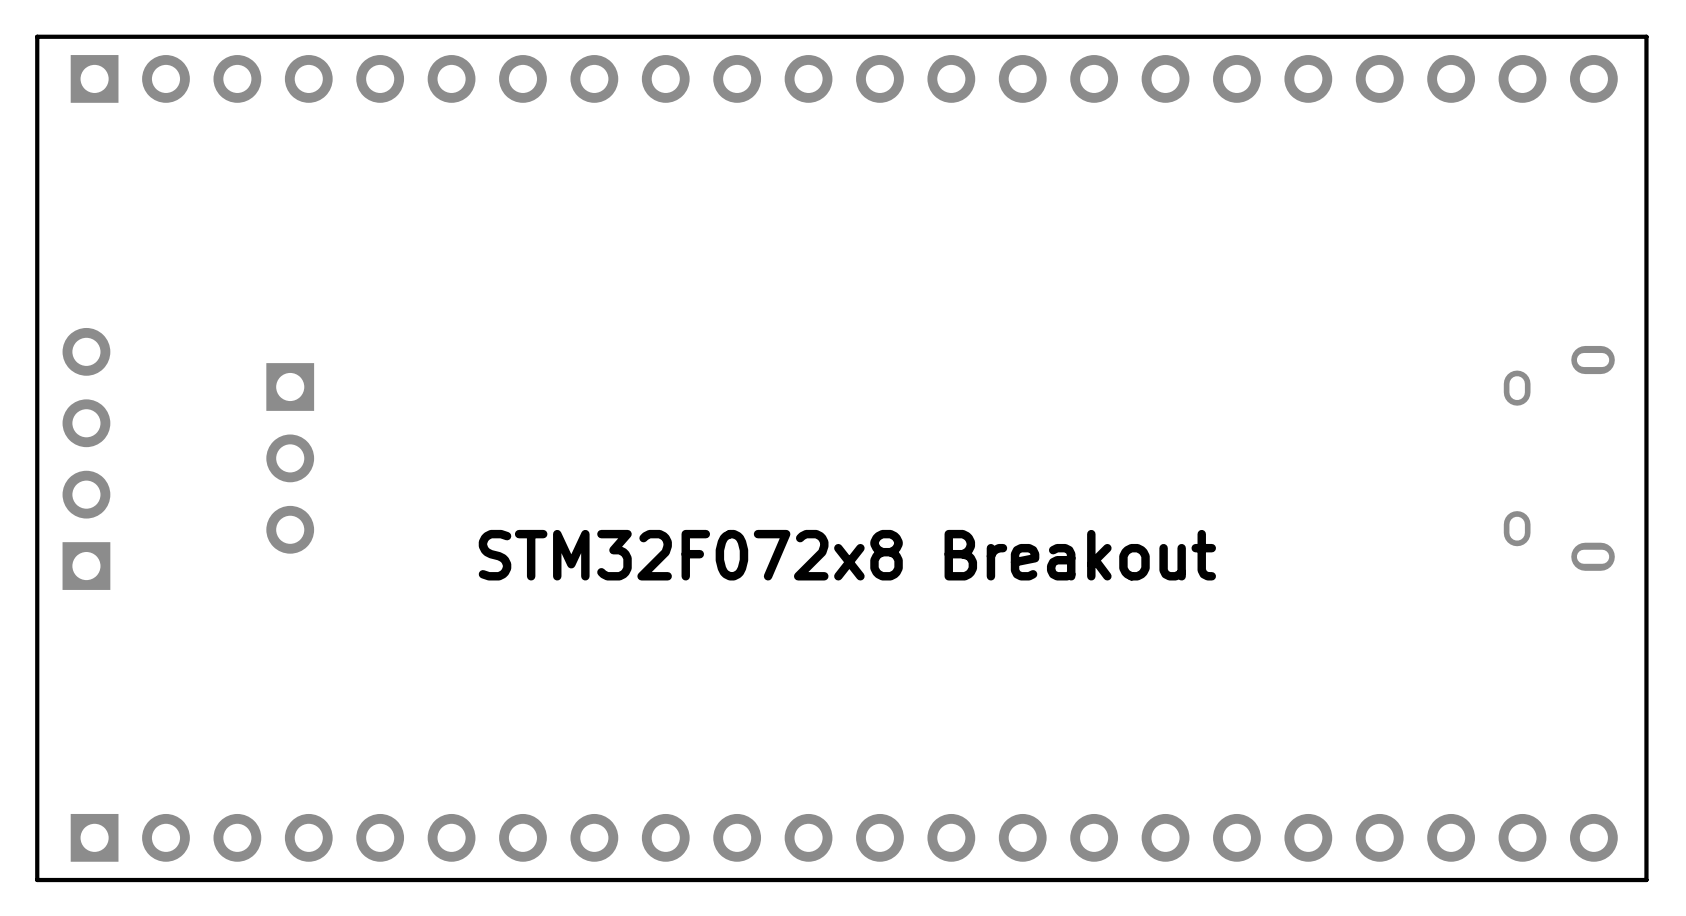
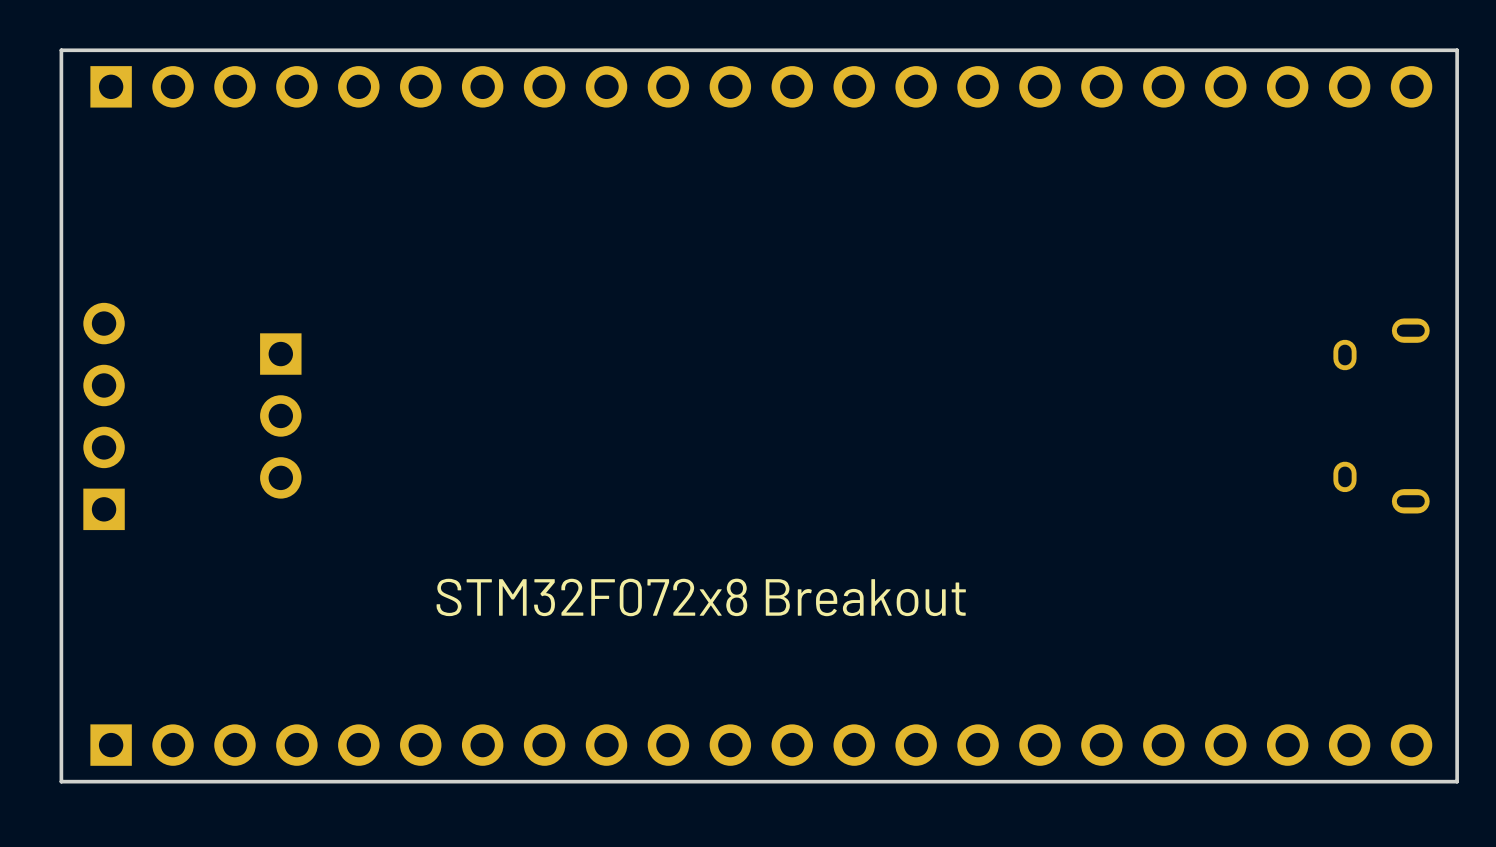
text position: STM32F072x8 Breakout (847, 555) -> STM32F072x8 Breakout (701, 597)

